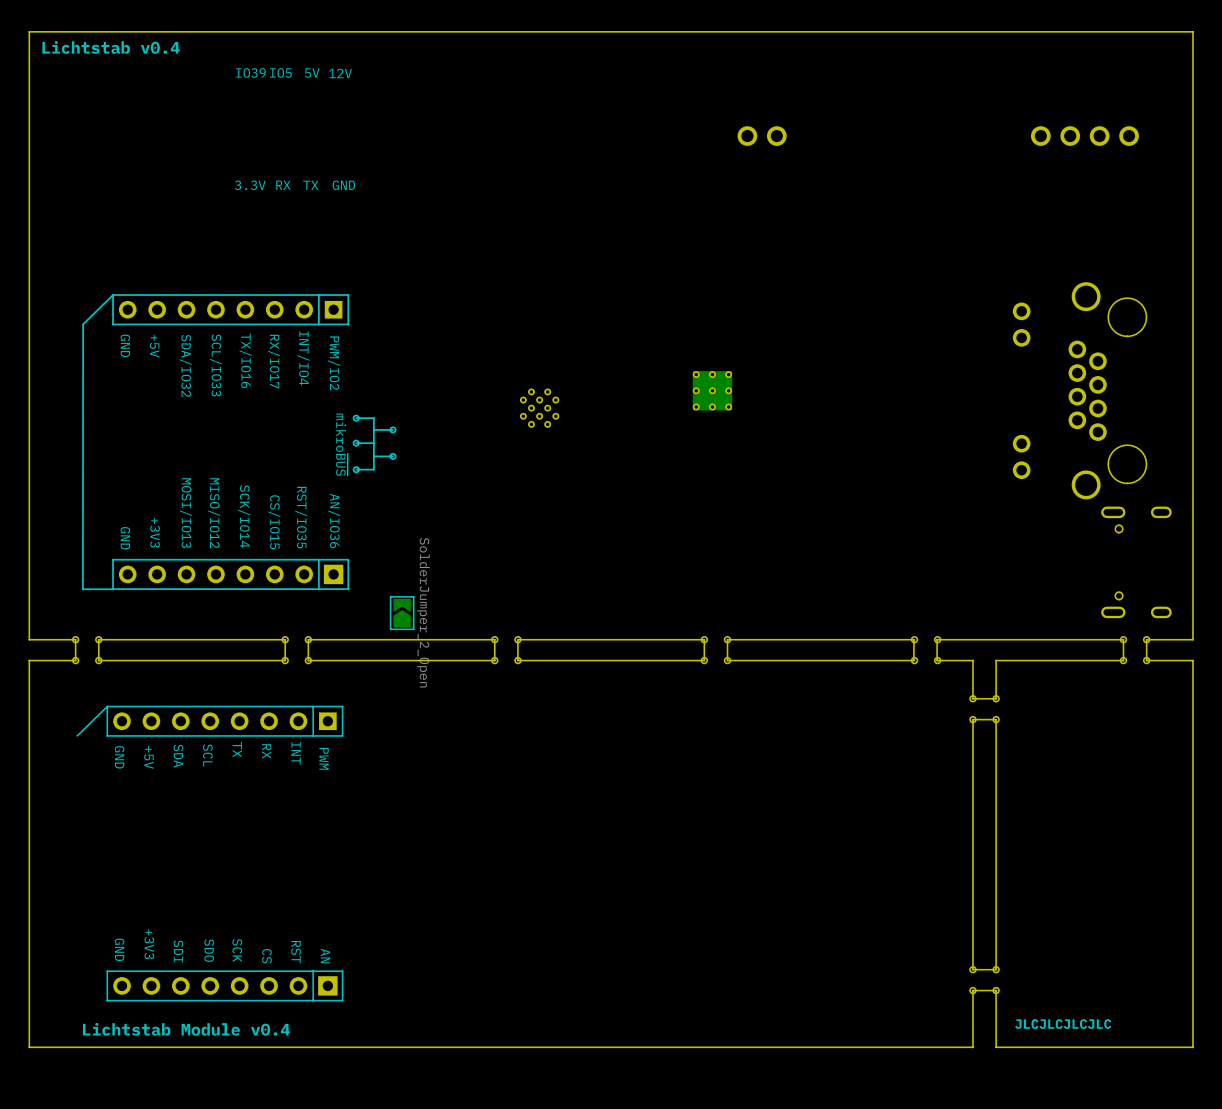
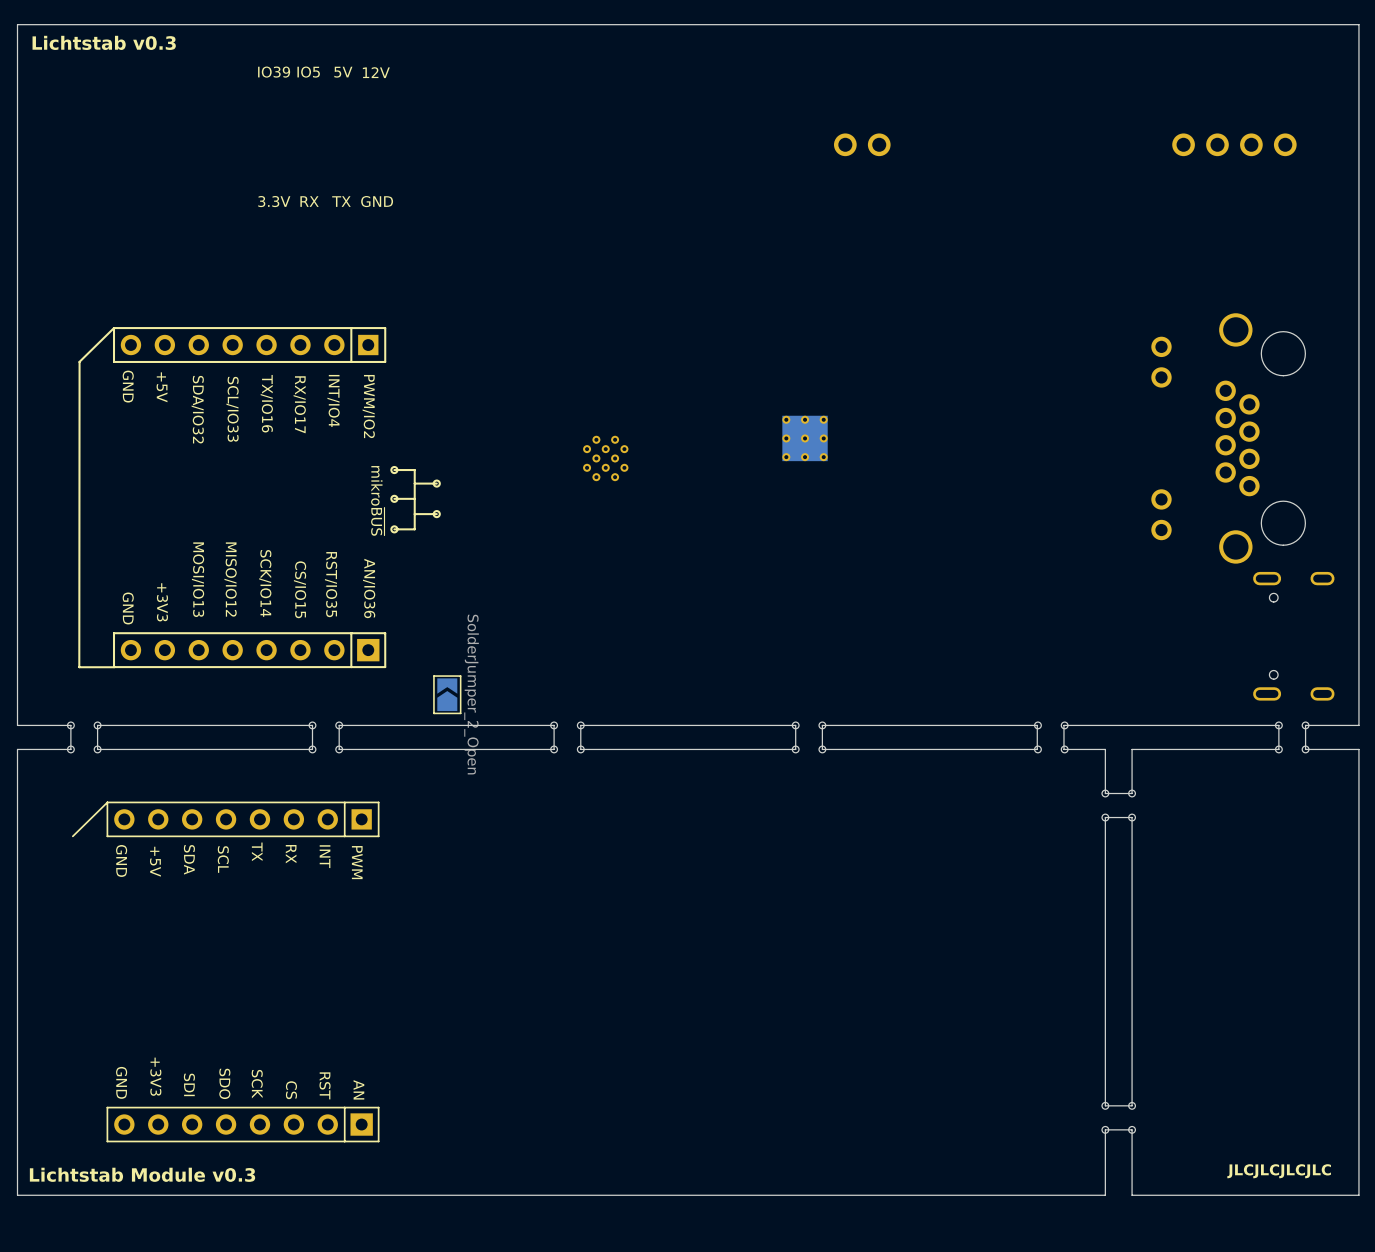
text: Lichtstab v0.4 (111, 47) -> Lichtstab v0.3 (104, 42)
text position: JLCJLCJLCJLC (1063, 1024) -> JLCJLCJLCJLC (1279, 1171)
text: Lichtstab Module v0.4 (186, 1029) -> Lichtstab Module v0.3 (142, 1174)

